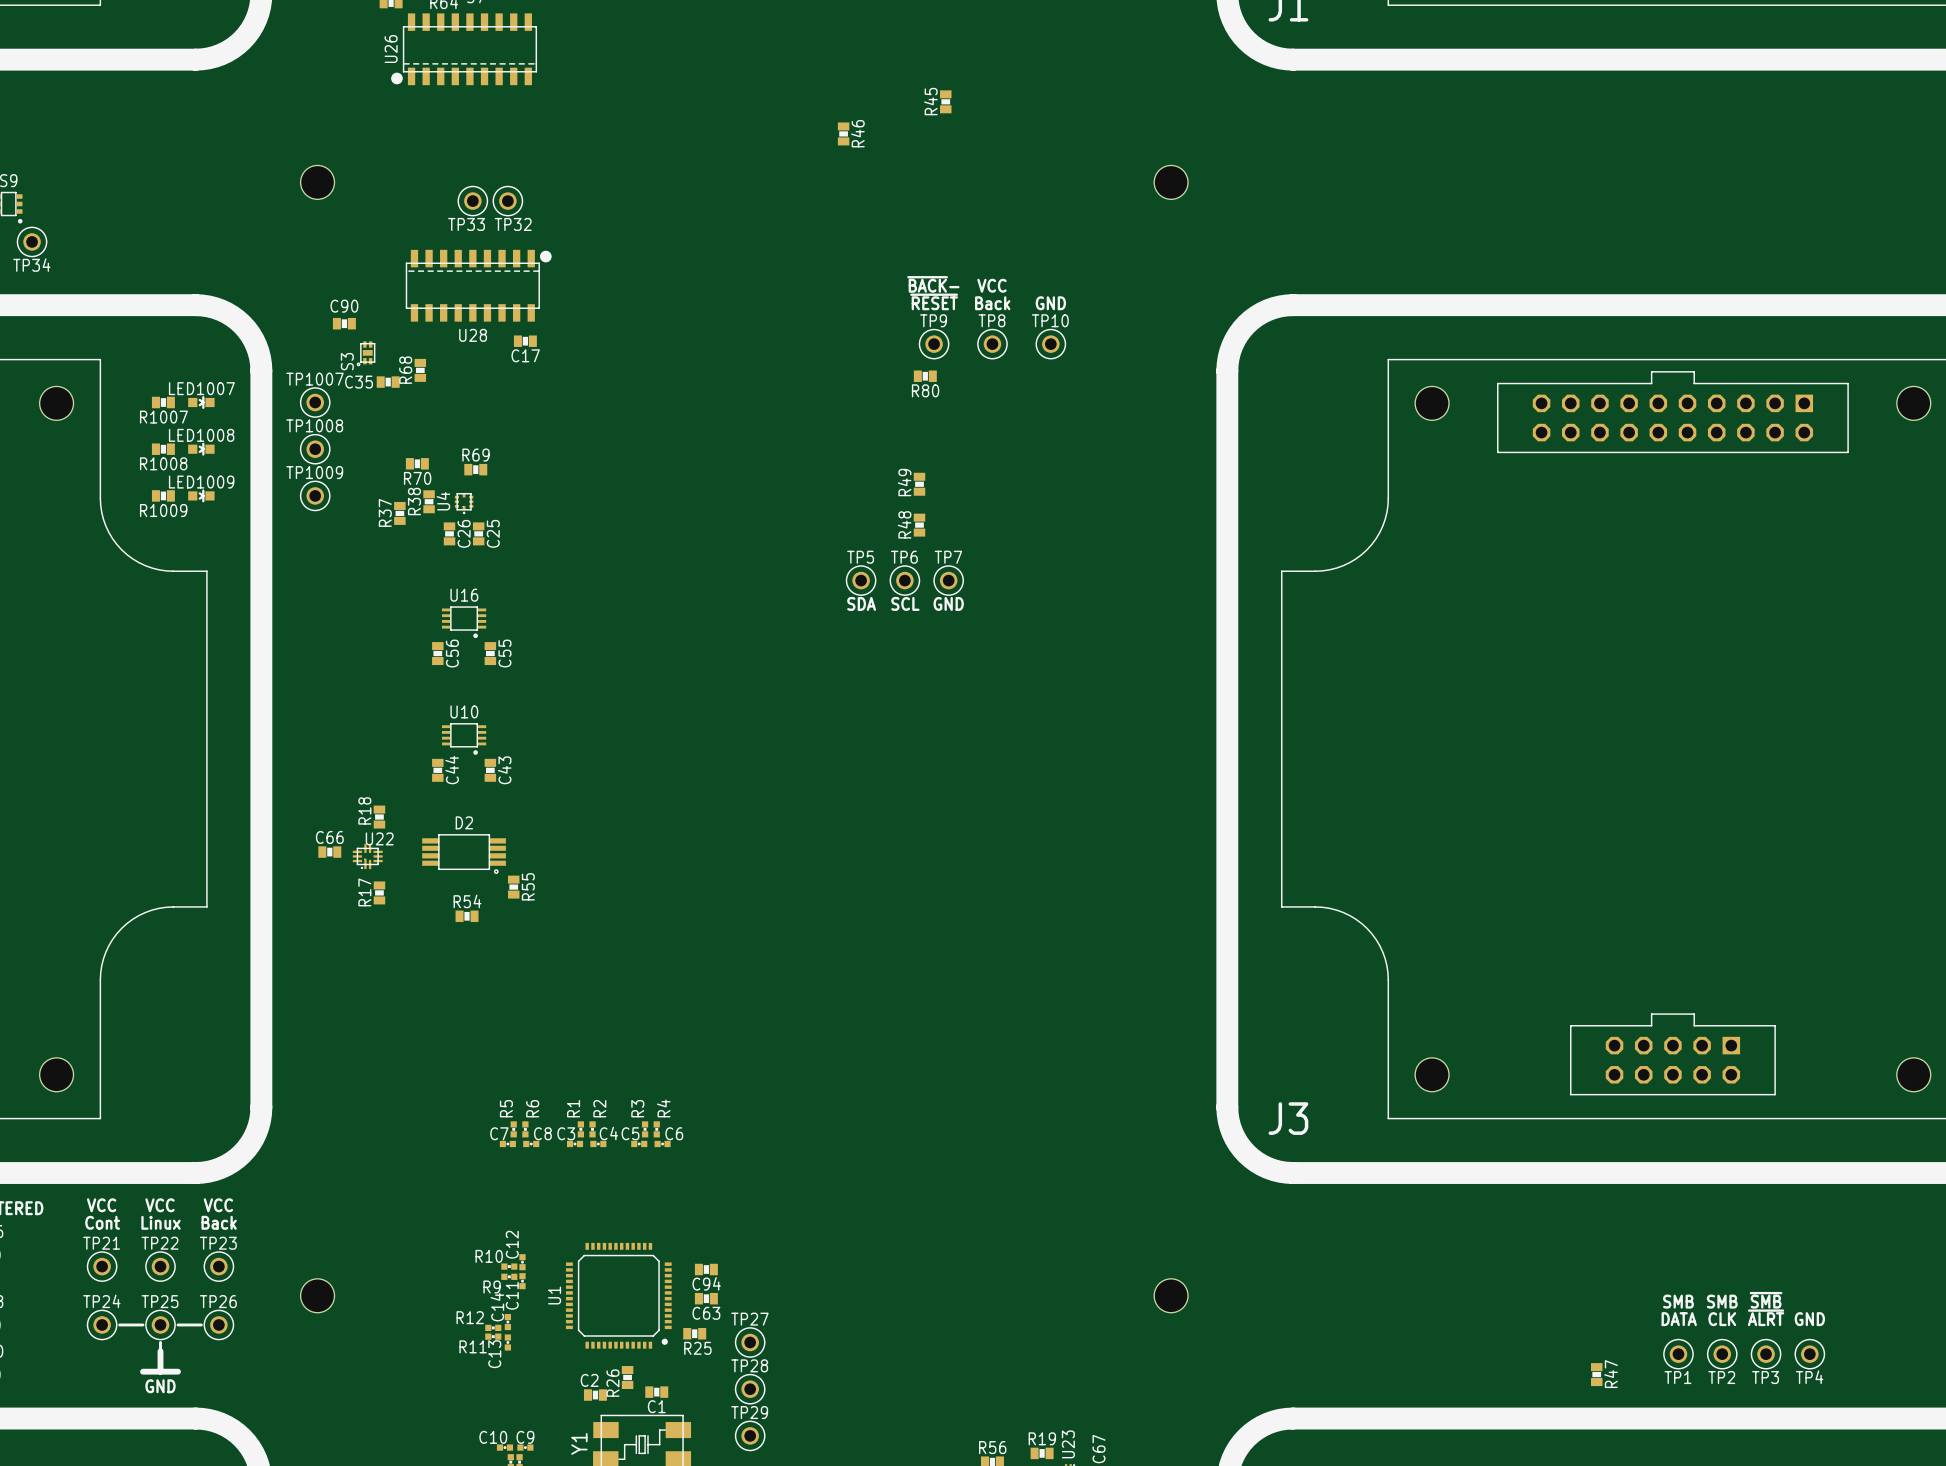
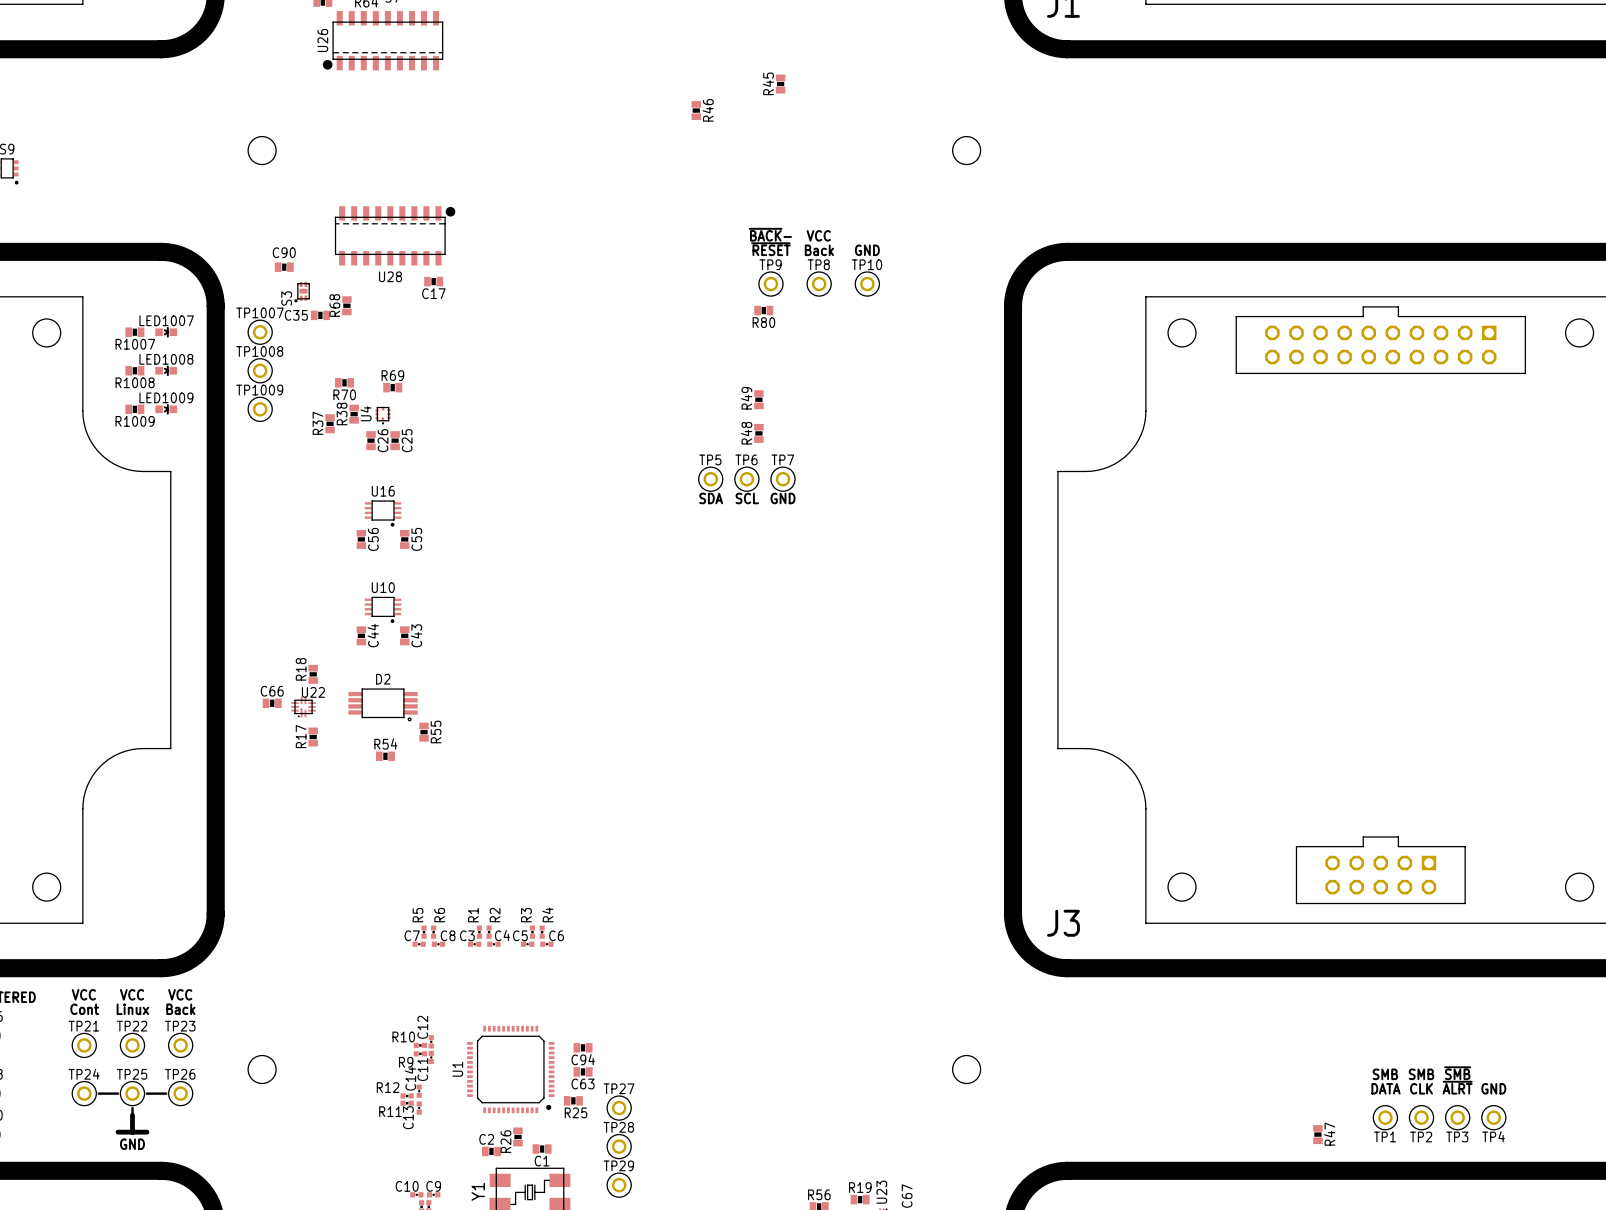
TP33: (472, 201) -> none
TP32: (507, 201) -> none
TP34: (32, 241) -> none

